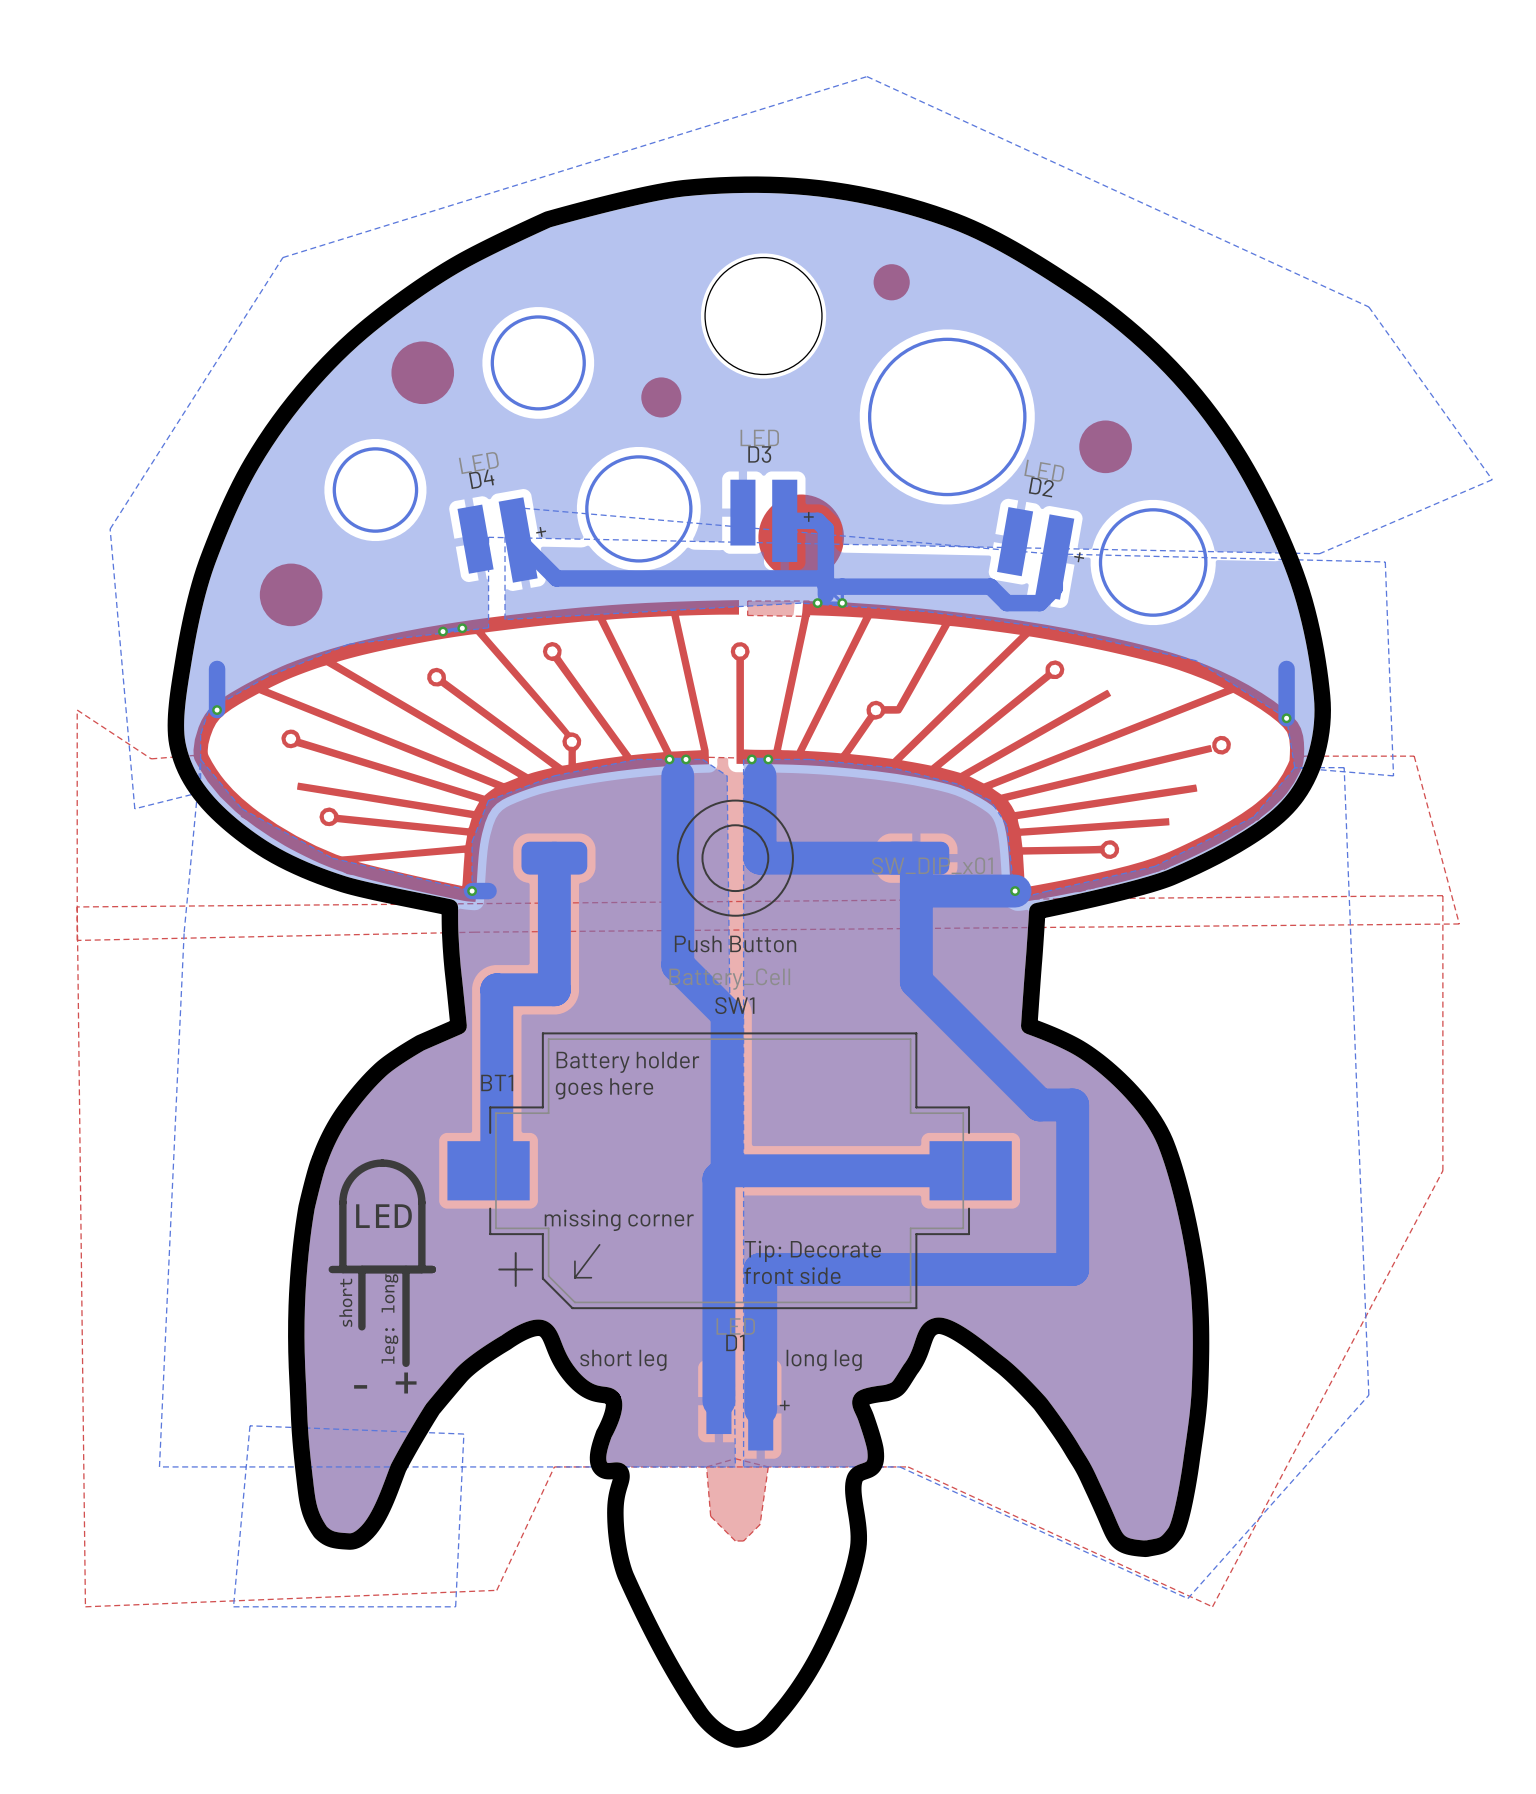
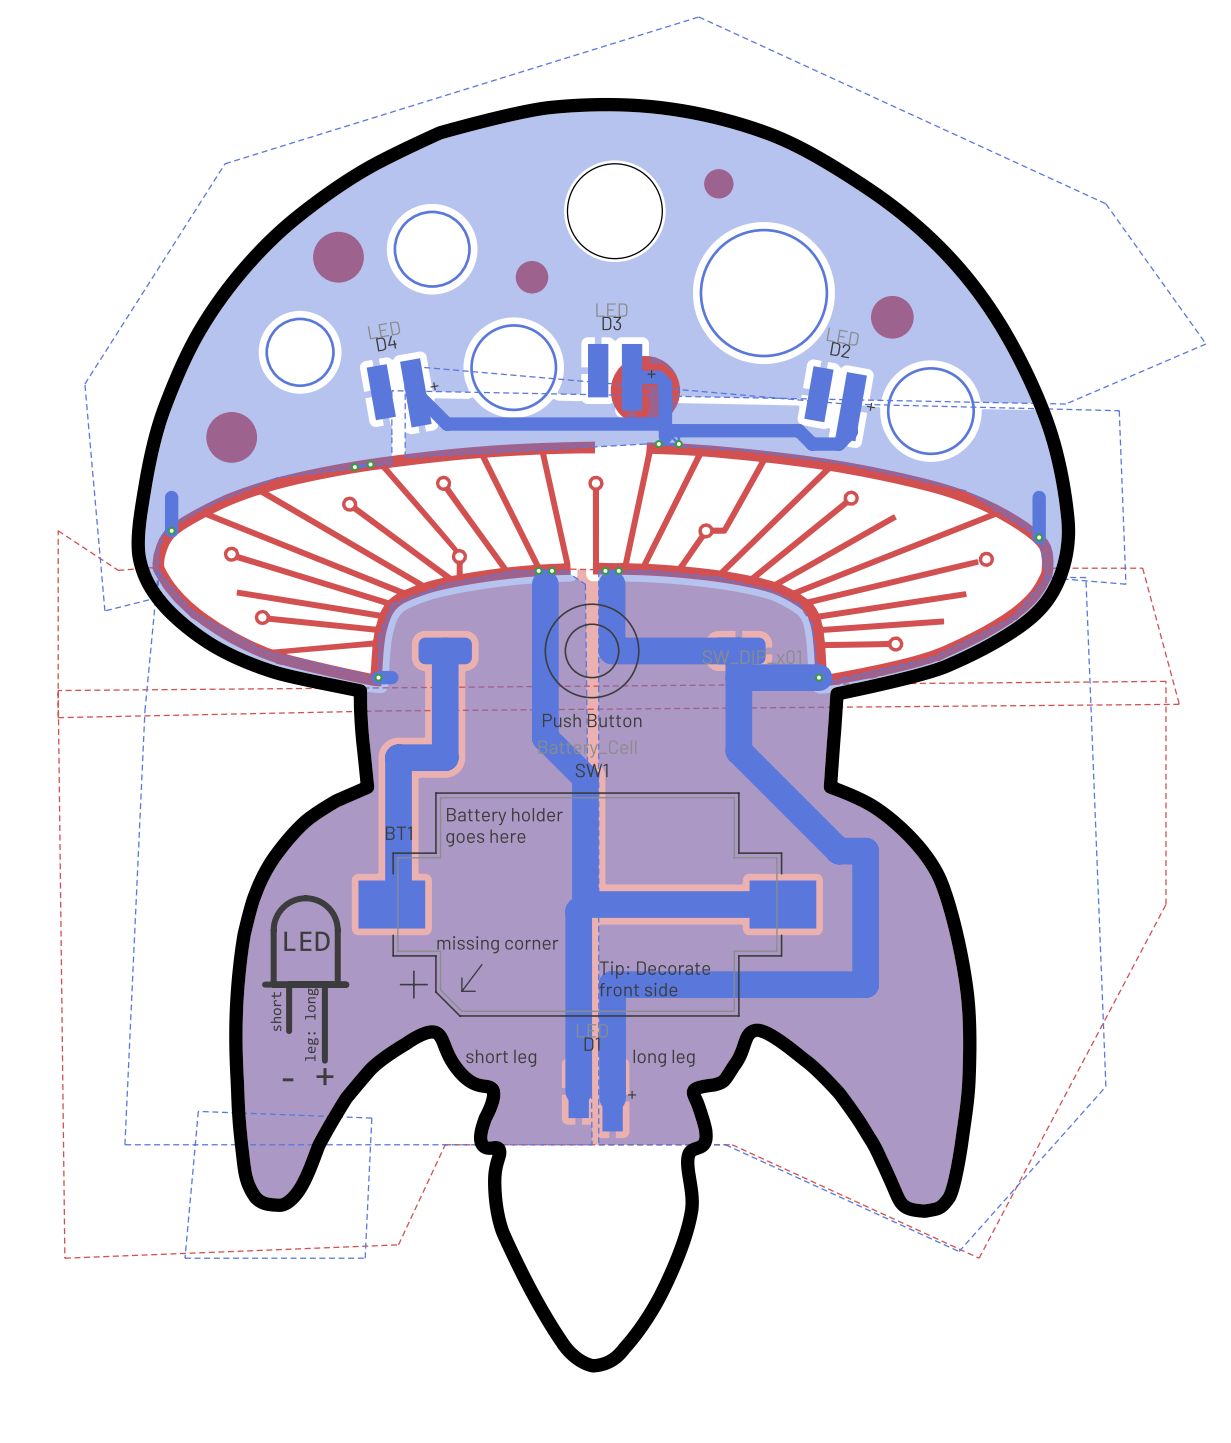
top zone outline: (809, 601) (747, 601) (747, 615) (809, 616) (809, 601) -> none
top zone outline: (735, 1458) (706, 1466) (710, 1516) (735, 1540) (743, 1540) (760, 1524) (768, 1466) (735, 1458) -> none

